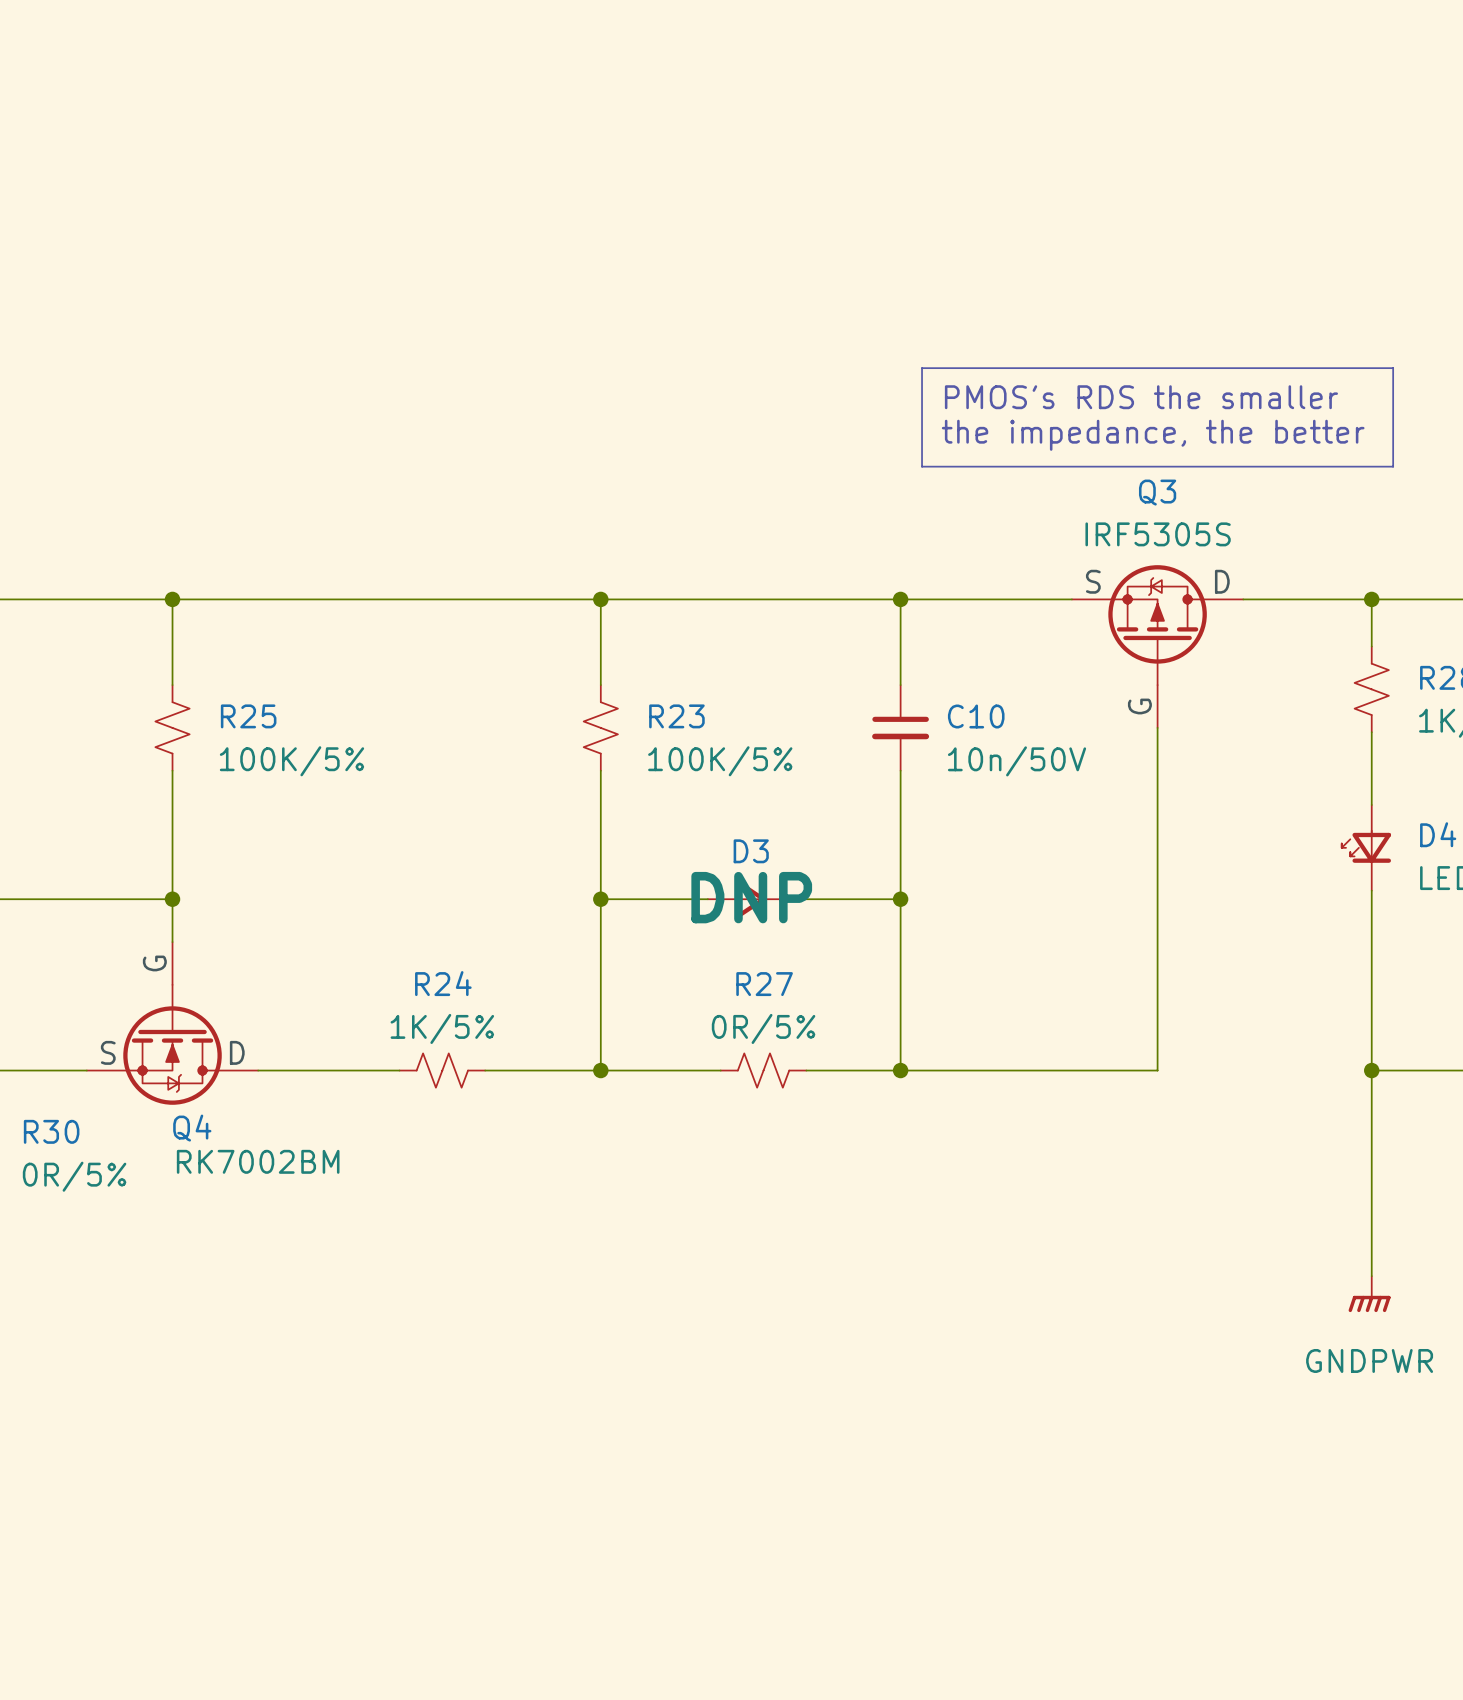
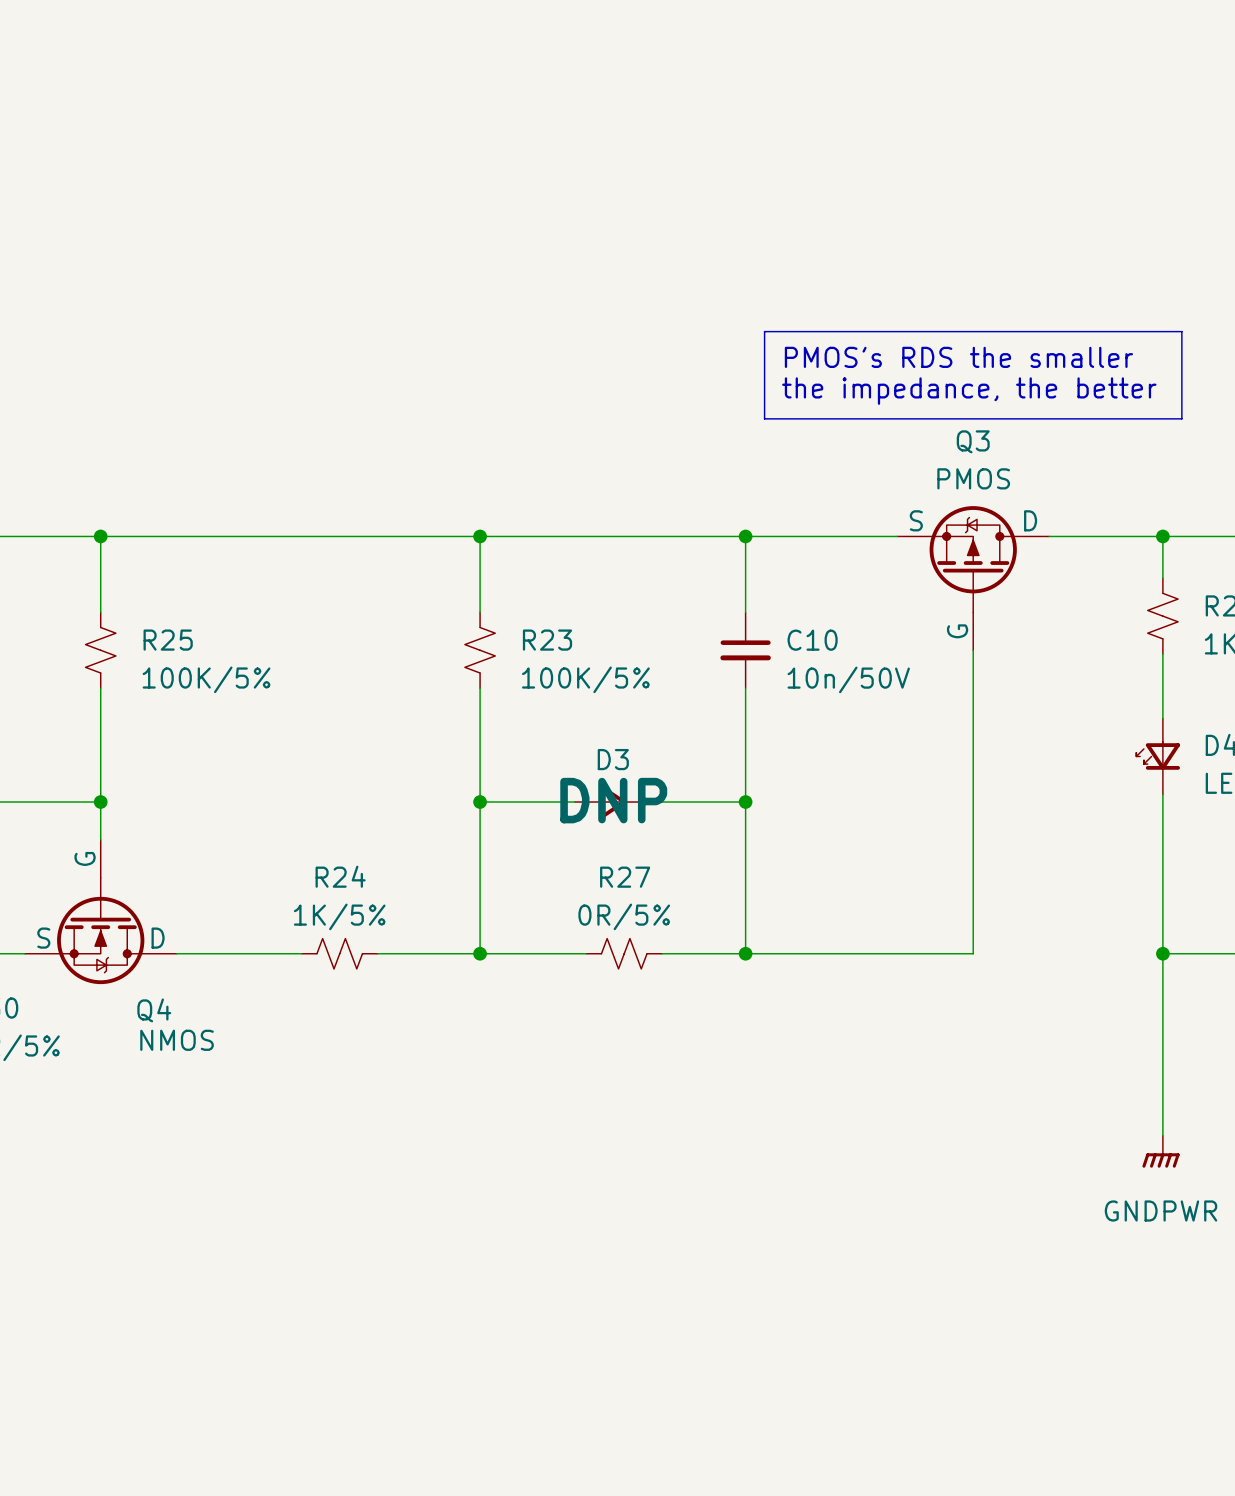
Q3 value: IRF5305S (1158, 534) -> PMOS (973, 478)
Q4 name position: Q4 (192, 1128) -> Q4 (154, 1010)
Q4 value: RK7002BM (258, 1161) -> NMOS (177, 1040)

